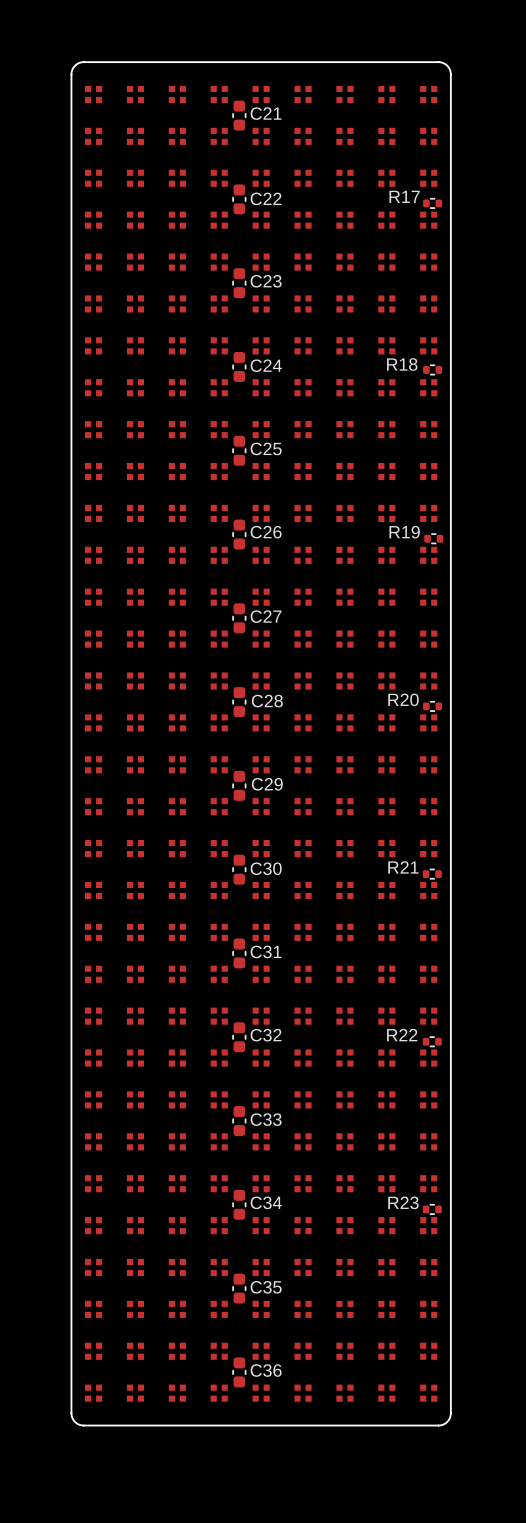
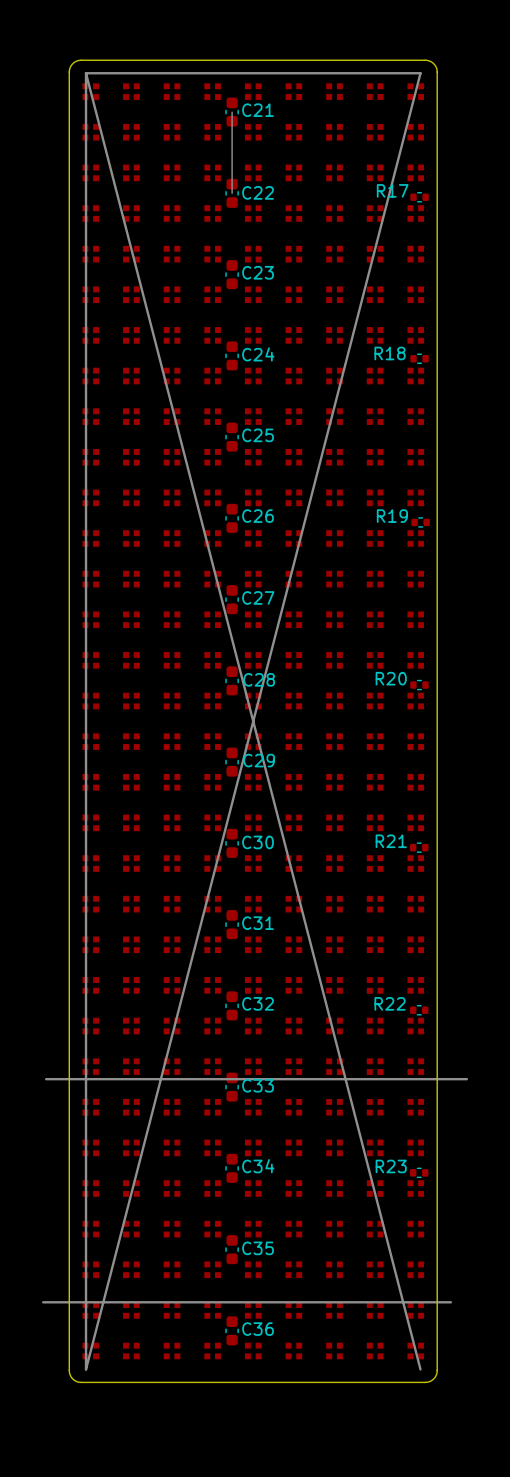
line: none -> (86, 73) (86, 1369) (420, 73) (86, 73)
line: none -> (86, 73) (420, 1369)
line: none -> (232, 112) (232, 193)
line: none -> (46, 1079) (466, 1079)
line: none -> (43, 1302) (450, 1302)

